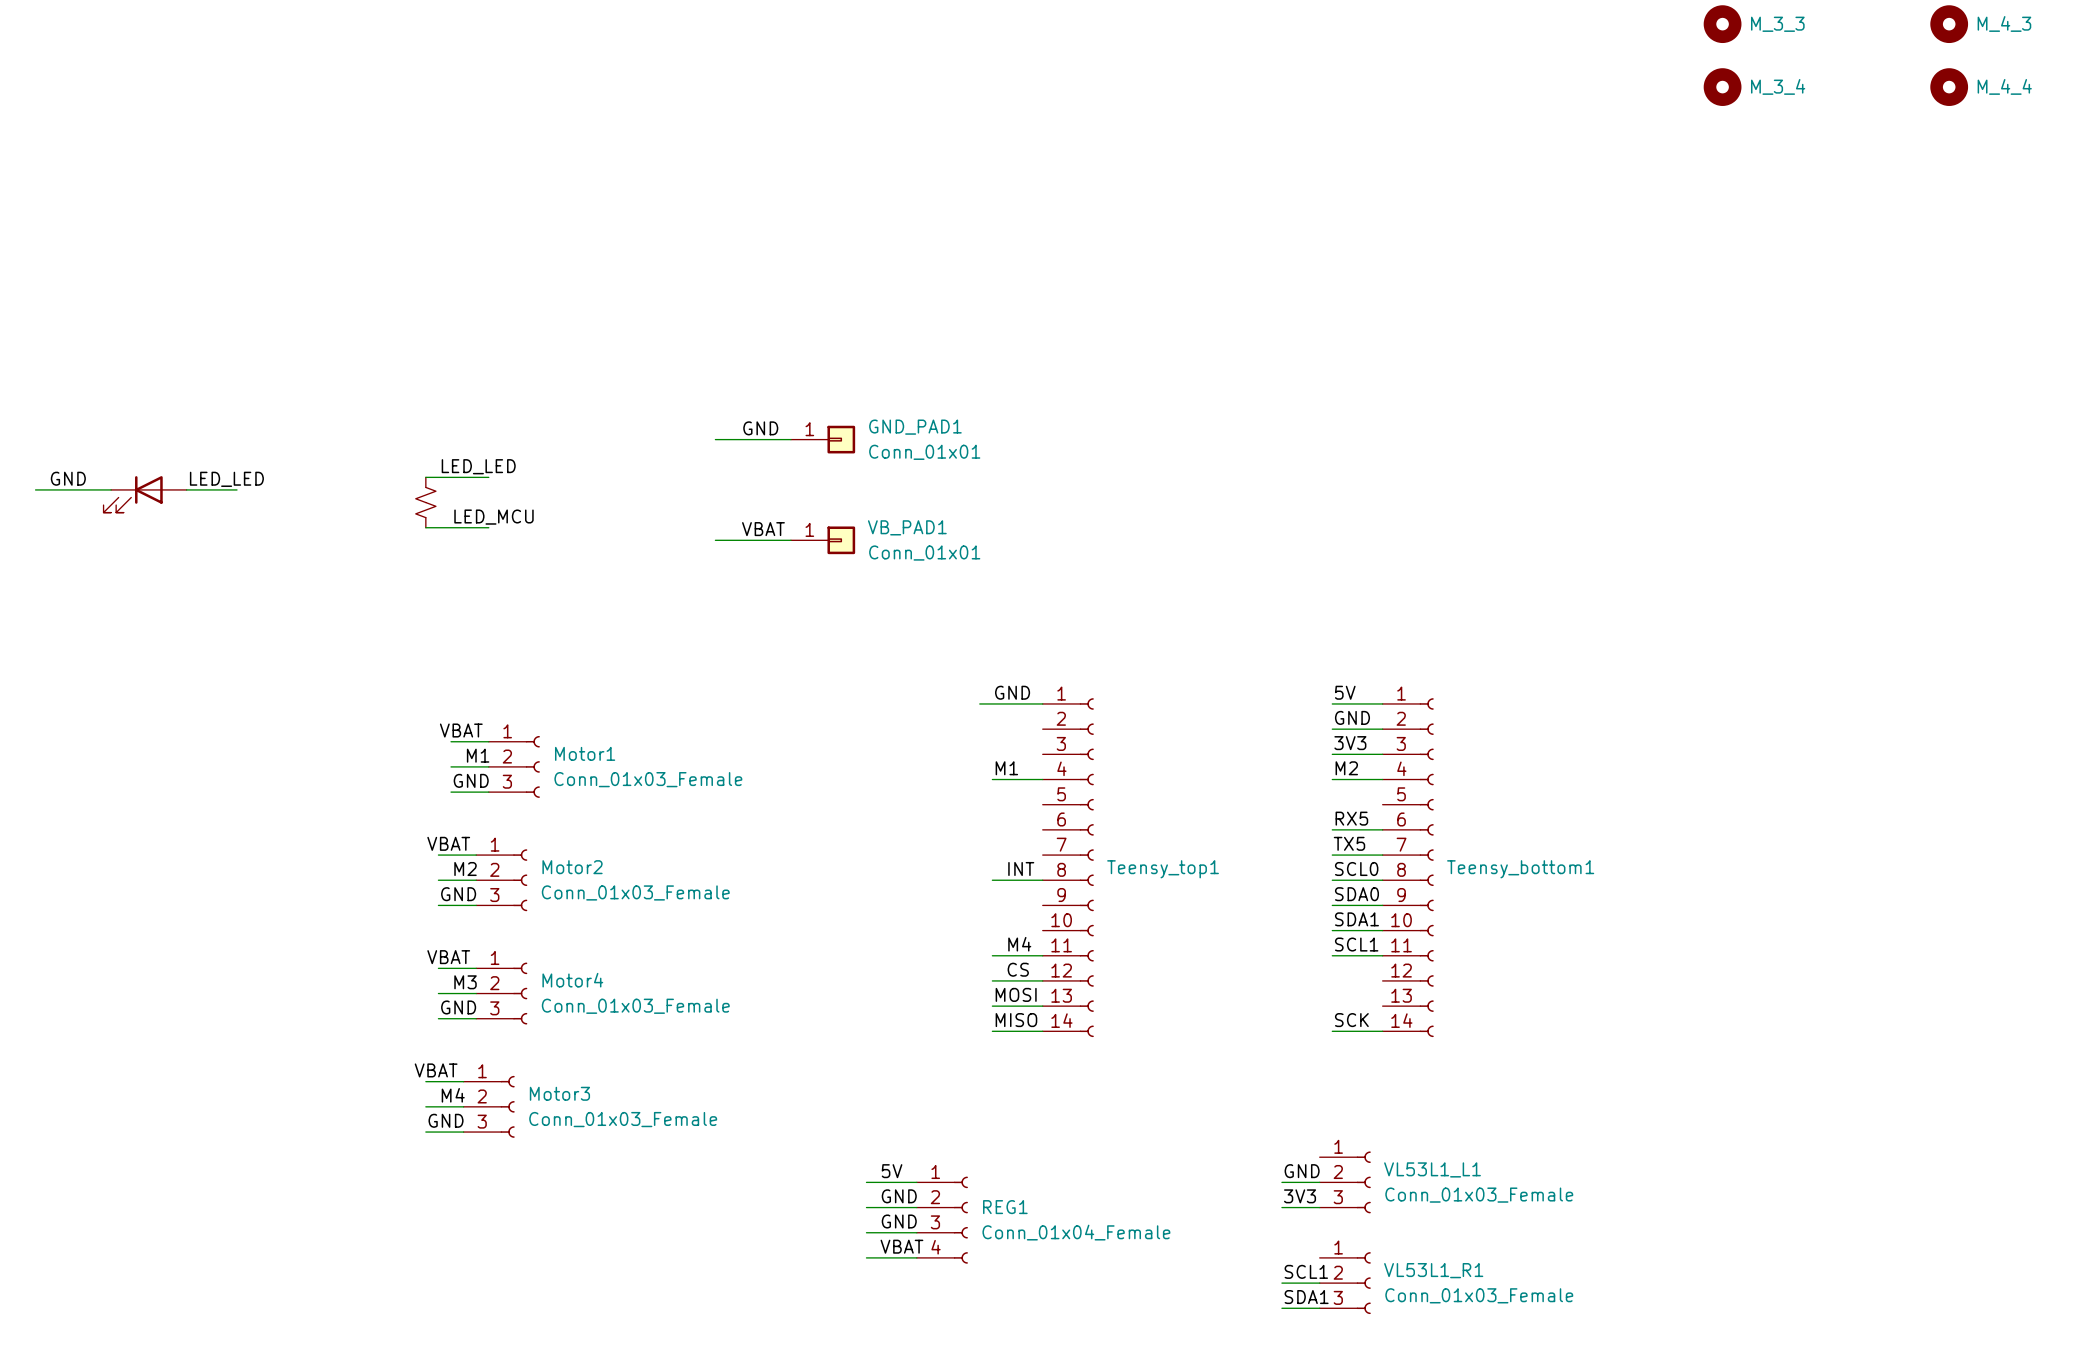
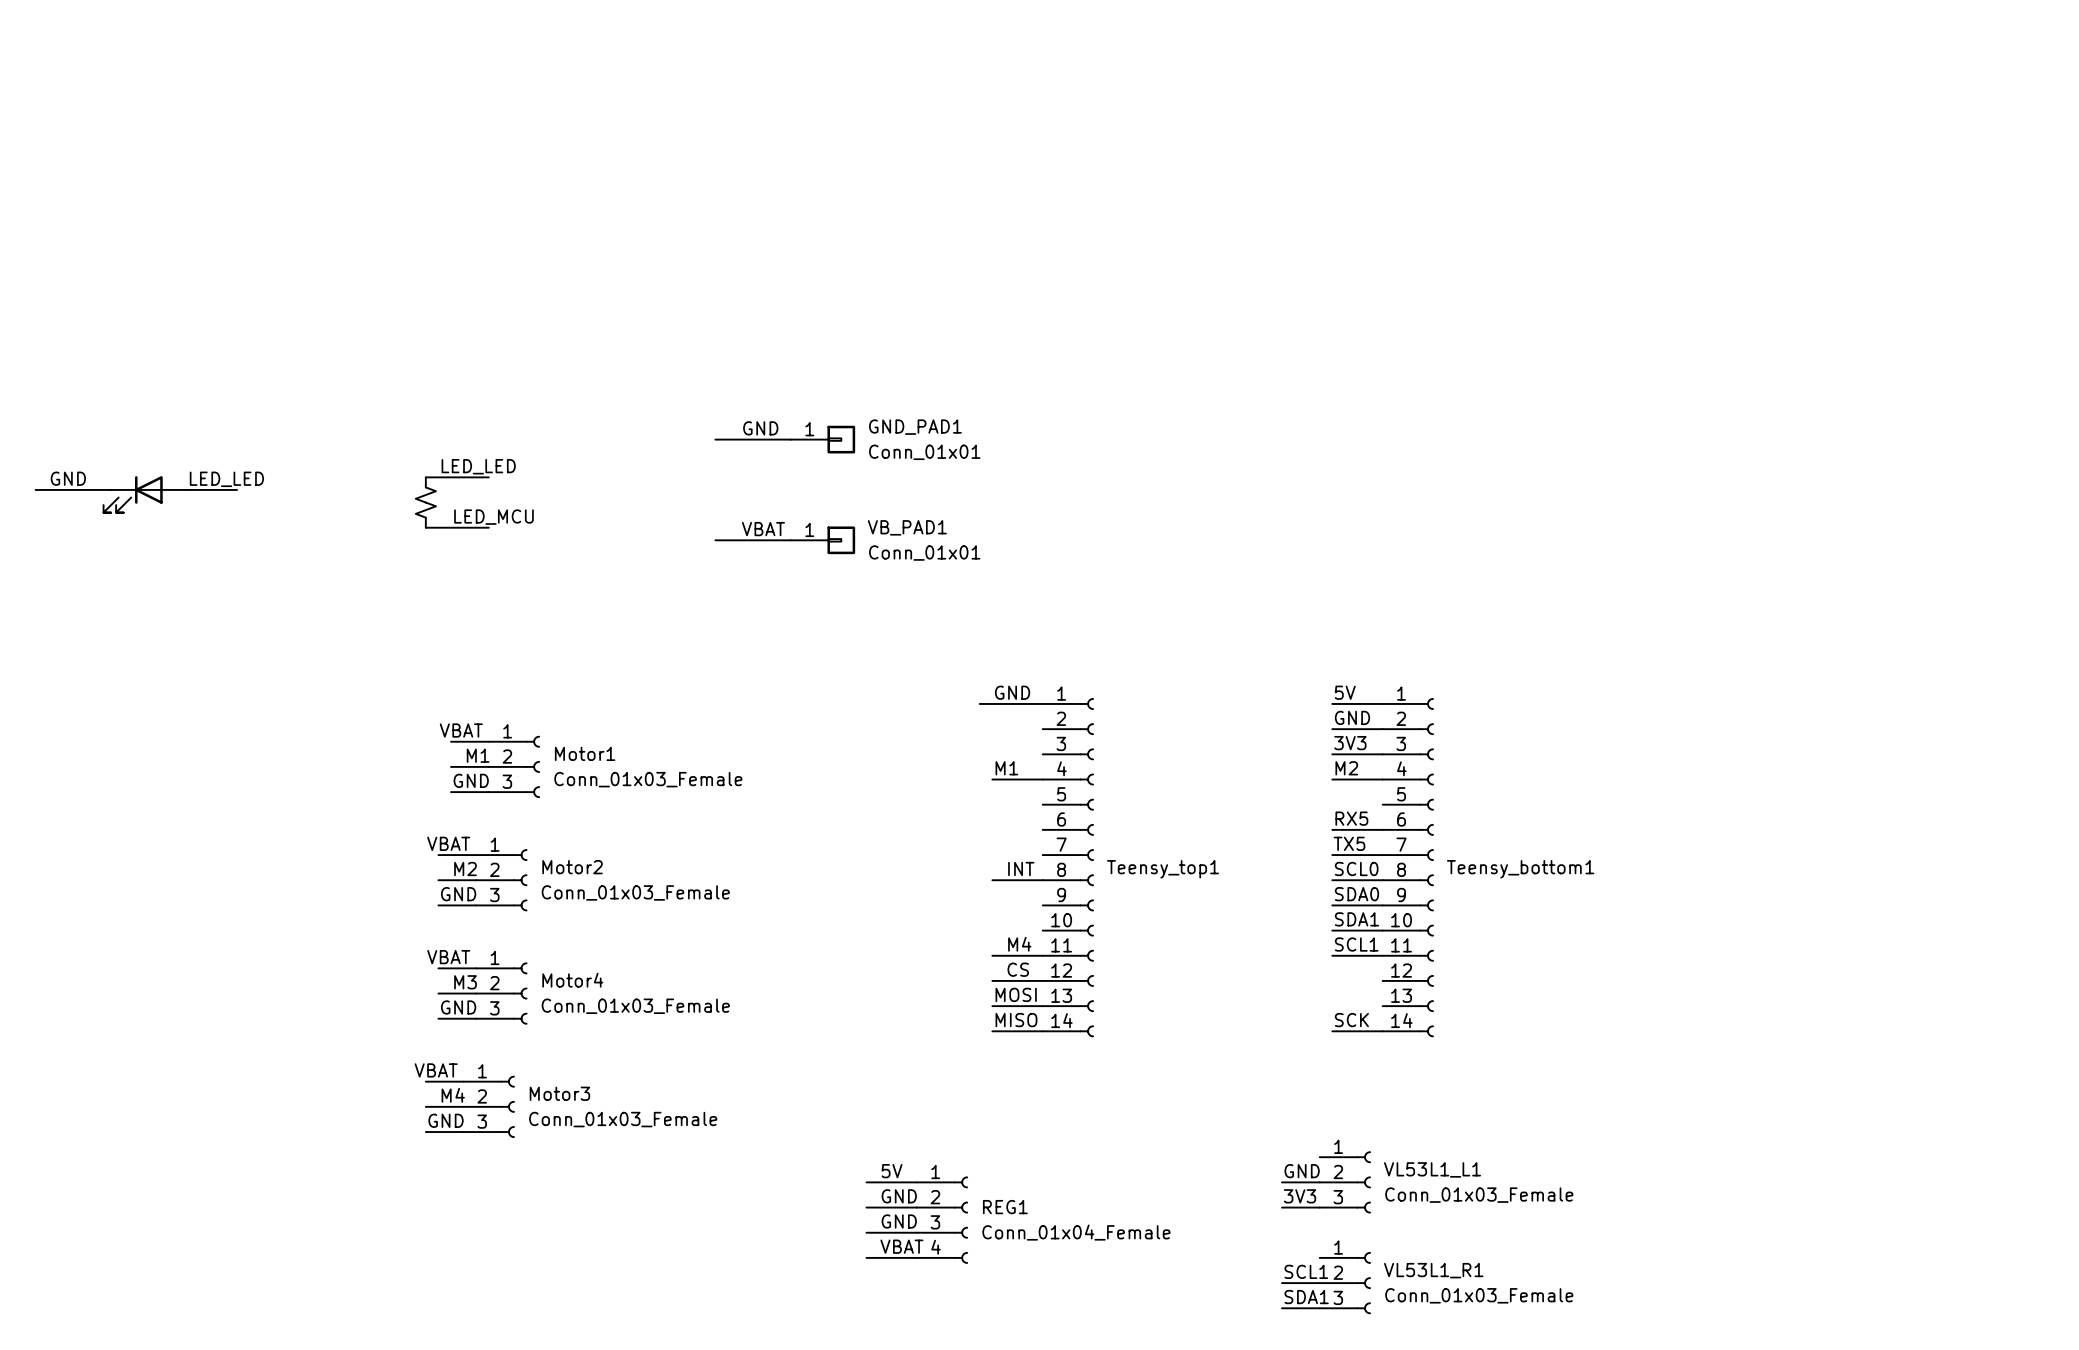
M_3_3: (1722, 24) -> none
M_4_3: (1949, 24) -> none
M_3_4: (1722, 87) -> none
M_4_4: (1949, 87) -> none

